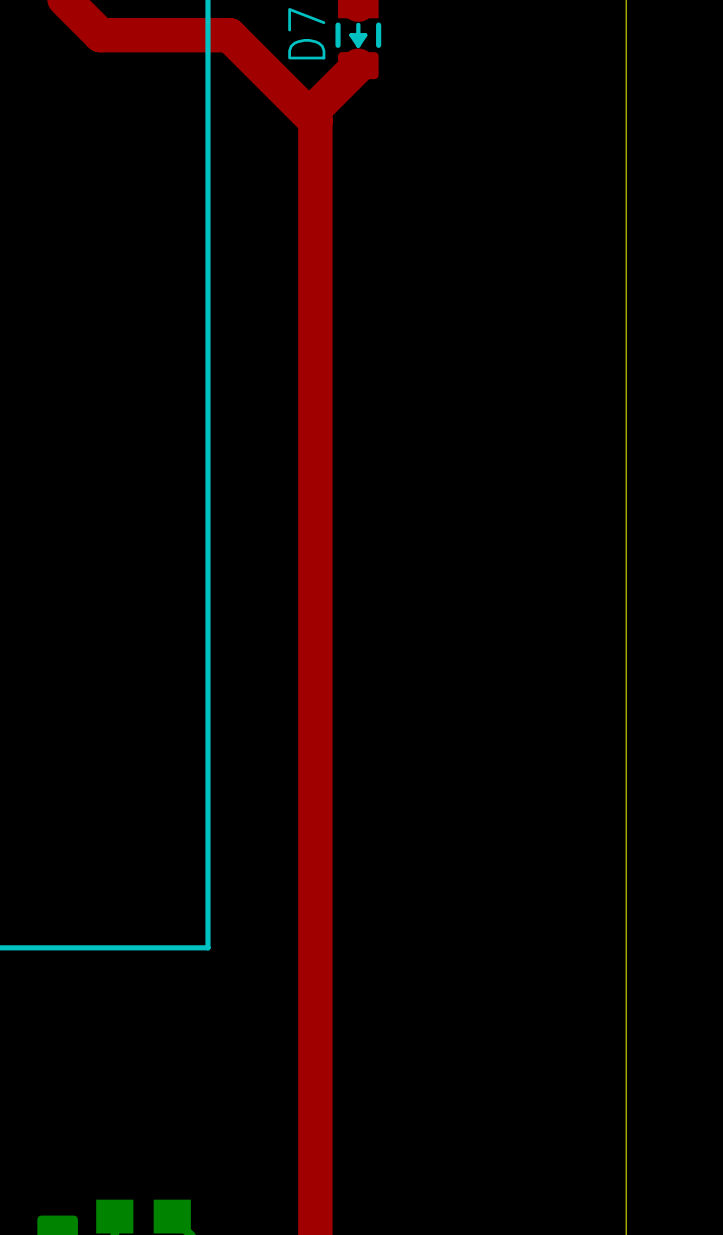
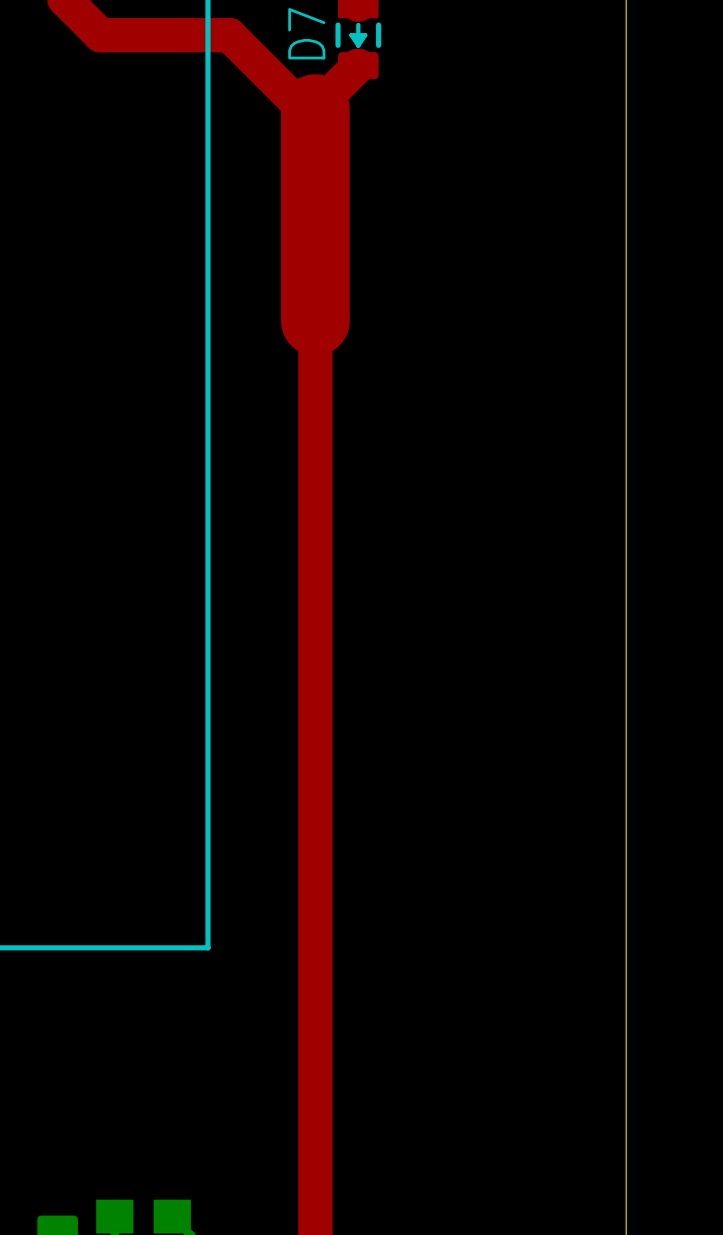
top track width: thin (315, 108) (315, 321) -> thick (315, 108) (315, 321)

